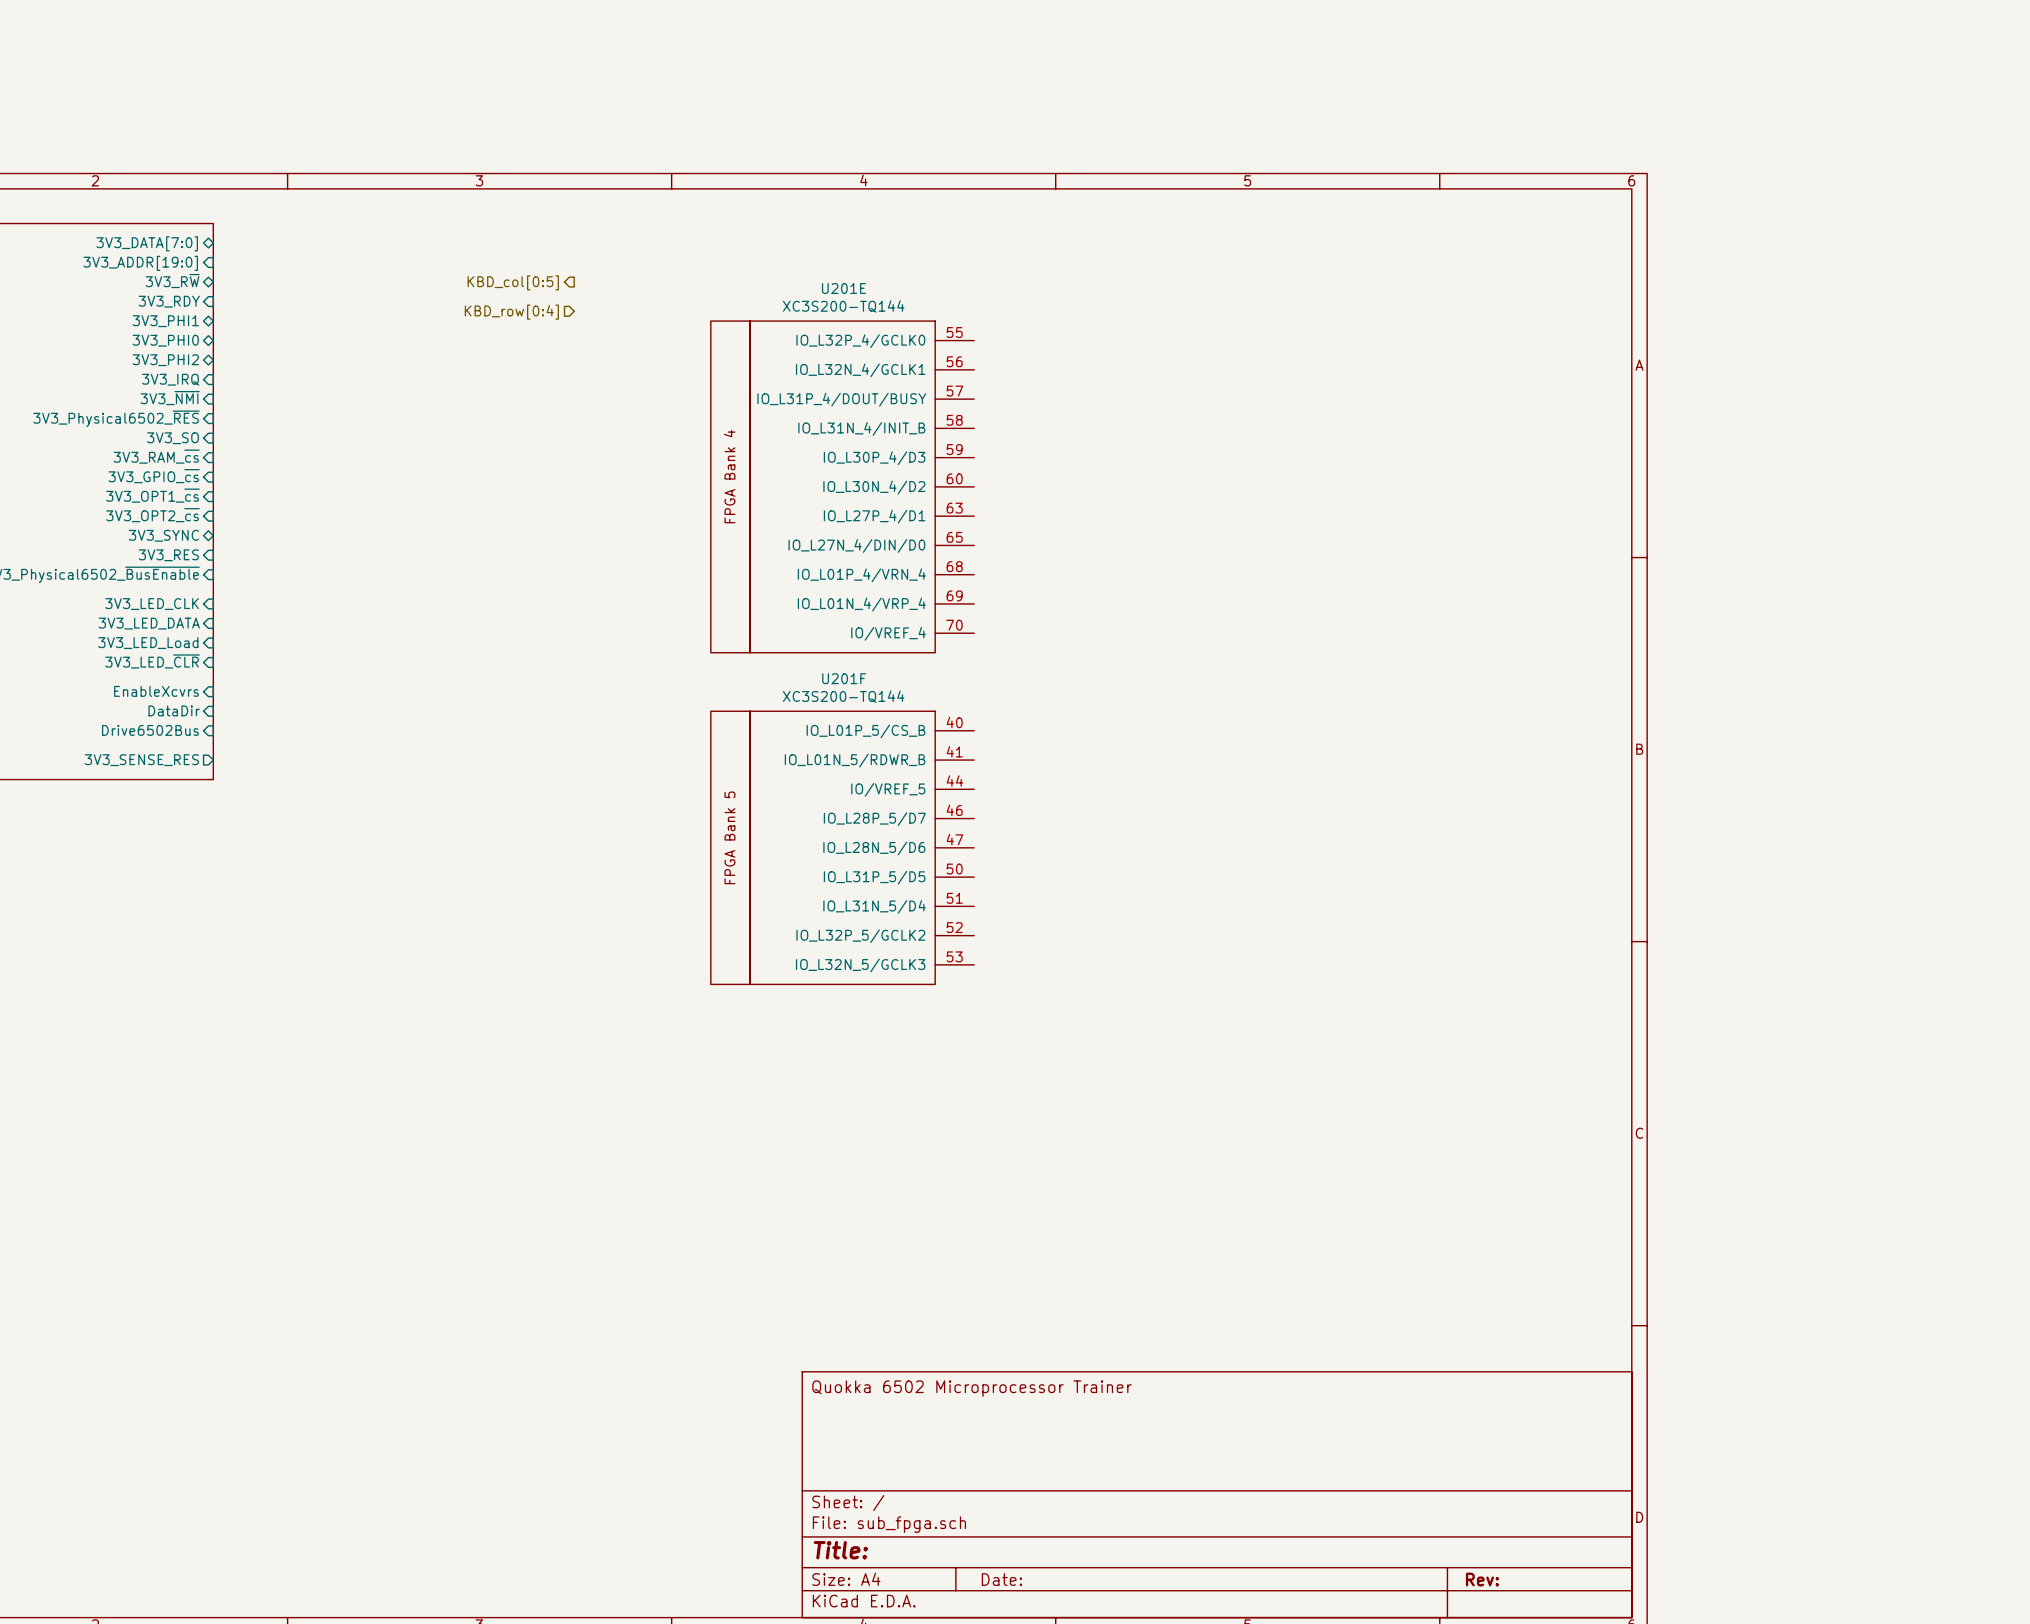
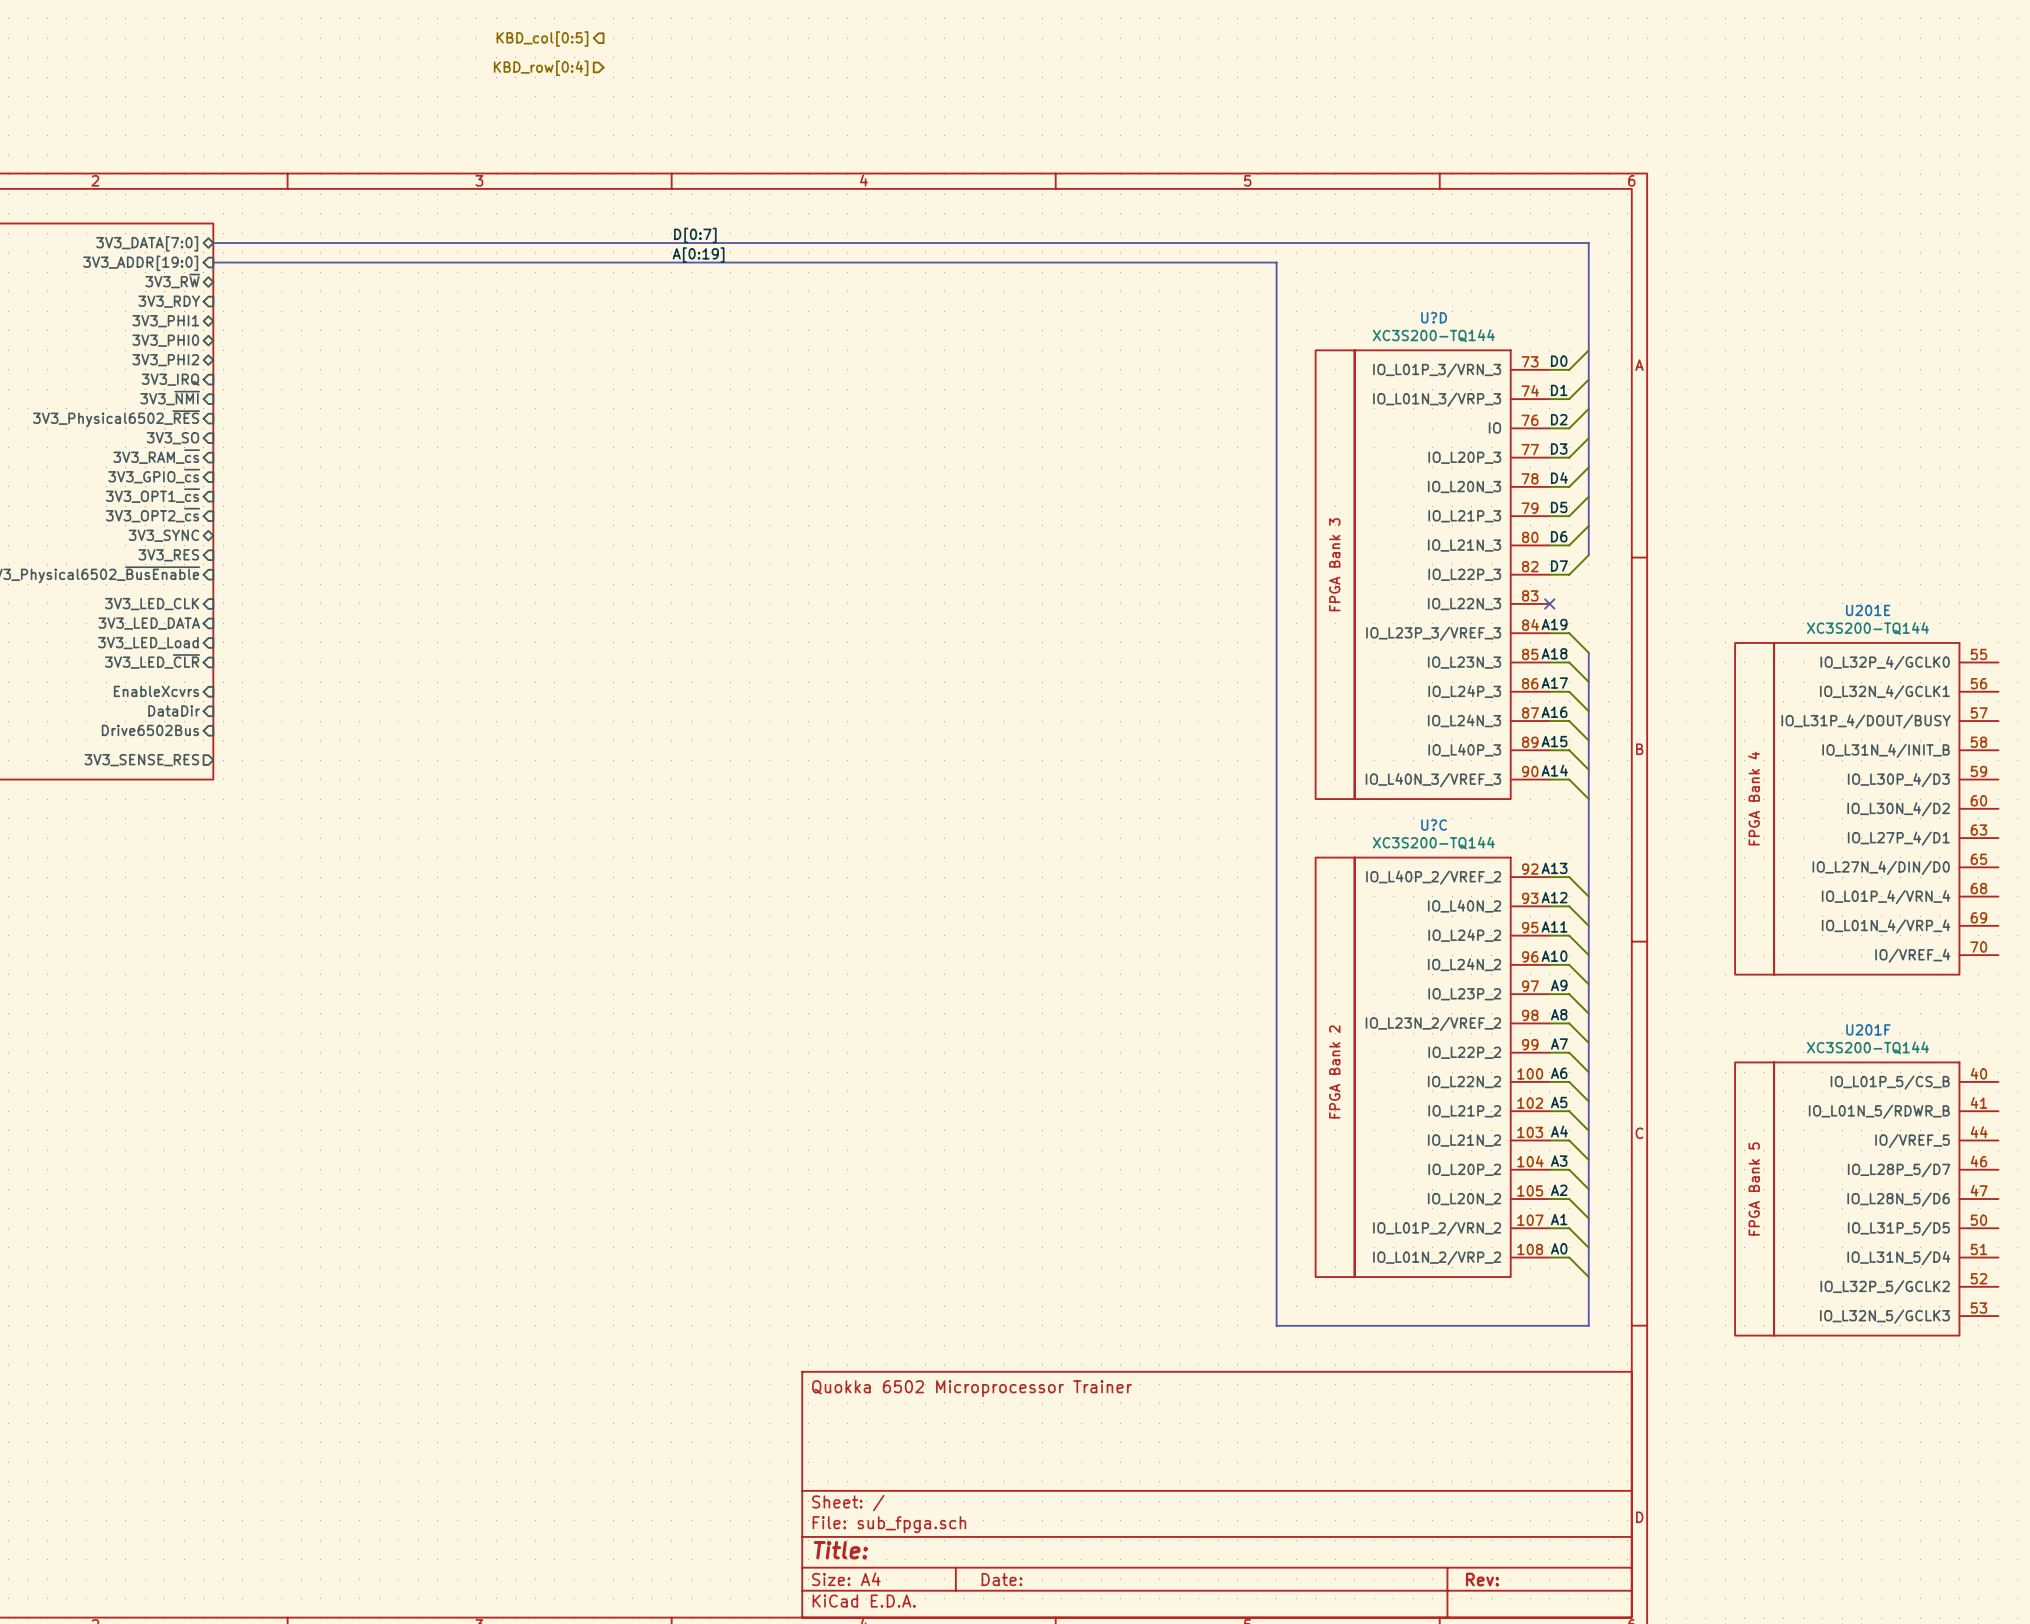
hierarchical label: none -> KBD_col[0:5] (542, 38)
hierarchical label: none -> KBD_row[0:4] (541, 68)
label: none -> D[0:7] (695, 235)
bus: none -> (213, 243) (1588, 243) (1588, 555)
label: none -> A[0:19] (698, 255)
bus: none -> (213, 262) (1276, 262) (1276, 1325) (1588, 1325) (1588, 652)
hierarchical label: KBD_col[0:5] (513, 282) -> none
hierarchical label: KBD_row[0:4] (511, 312) -> none
wire: none -> (1588, 350) (1569, 369) (1549, 369)
label: none -> D0 (1559, 361)
wire: none -> (1588, 379) (1569, 399) (1549, 399)
label: none -> D1 (1559, 390)
wire: none -> (1588, 408) (1569, 428) (1549, 428)
label: none -> D2 (1559, 419)
wire: none -> (1588, 438) (1569, 457) (1549, 457)
label: none -> D3 (1559, 448)
wire: none -> (1588, 467) (1569, 486) (1549, 486)
label: none -> D4 (1559, 477)
U201E position: (842, 486) -> (1866, 808)
wire: none -> (1588, 496) (1569, 516) (1549, 516)
label: none -> D5 (1559, 507)
wire: none -> (1588, 525) (1569, 545) (1549, 545)
label: none -> D6 (1559, 536)
wire: none -> (1588, 555) (1569, 574) (1549, 574)
label: none -> D7 (1559, 565)
U?D: none -> XC3S200-TQ144 (1432, 574)
no-connect mark: none -> (1549, 603)
label: none -> A19 (1554, 624)
wire: none -> (1549, 633) (1569, 633) (1588, 652)
label: none -> A18 (1554, 653)
wire: none -> (1549, 662) (1569, 662) (1588, 682)
label: none -> A17 (1554, 683)
wire: none -> (1549, 691) (1569, 691) (1588, 711)
label: none -> A16 (1554, 712)
wire: none -> (1549, 721) (1569, 721) (1588, 740)
label: none -> A15 (1554, 741)
wire: none -> (1549, 750) (1569, 750) (1588, 769)
label: none -> A14 (1554, 770)
wire: none -> (1549, 779) (1569, 779) (1588, 799)
U201F position: (842, 847) -> (1866, 1199)
label: none -> A13 (1554, 868)
wire: none -> (1549, 877) (1569, 877) (1588, 896)
label: none -> A12 (1554, 897)
wire: none -> (1549, 906) (1569, 906) (1588, 925)
label: none -> A11 (1554, 926)
wire: none -> (1549, 935) (1569, 935) (1588, 955)
label: none -> A10 (1554, 956)
wire: none -> (1549, 964) (1569, 964) (1588, 984)
label: none -> A9 (1559, 985)
wire: none -> (1549, 994) (1569, 994) (1588, 1013)
label: none -> A8 (1559, 1014)
wire: none -> (1549, 1023) (1569, 1023) (1588, 1042)
label: none -> A7 (1559, 1043)
wire: none -> (1549, 1052) (1569, 1052) (1588, 1072)
U?C: none -> XC3S200-TQ144 (1432, 1067)
label: none -> A6 (1559, 1073)
wire: none -> (1549, 1081) (1569, 1081) (1588, 1101)
label: none -> A5 (1559, 1102)
wire: none -> (1549, 1111) (1569, 1111) (1588, 1130)
label: none -> A4 (1559, 1131)
wire: none -> (1549, 1140) (1569, 1140) (1588, 1159)
label: none -> A3 (1559, 1161)
wire: none -> (1549, 1169) (1569, 1169) (1588, 1189)
label: none -> A2 (1559, 1190)
wire: none -> (1549, 1199) (1569, 1199) (1588, 1218)
label: none -> A1 (1559, 1219)
wire: none -> (1549, 1228) (1569, 1228) (1588, 1247)
label: none -> A0 (1559, 1248)
wire: none -> (1549, 1257) (1569, 1257) (1588, 1277)

